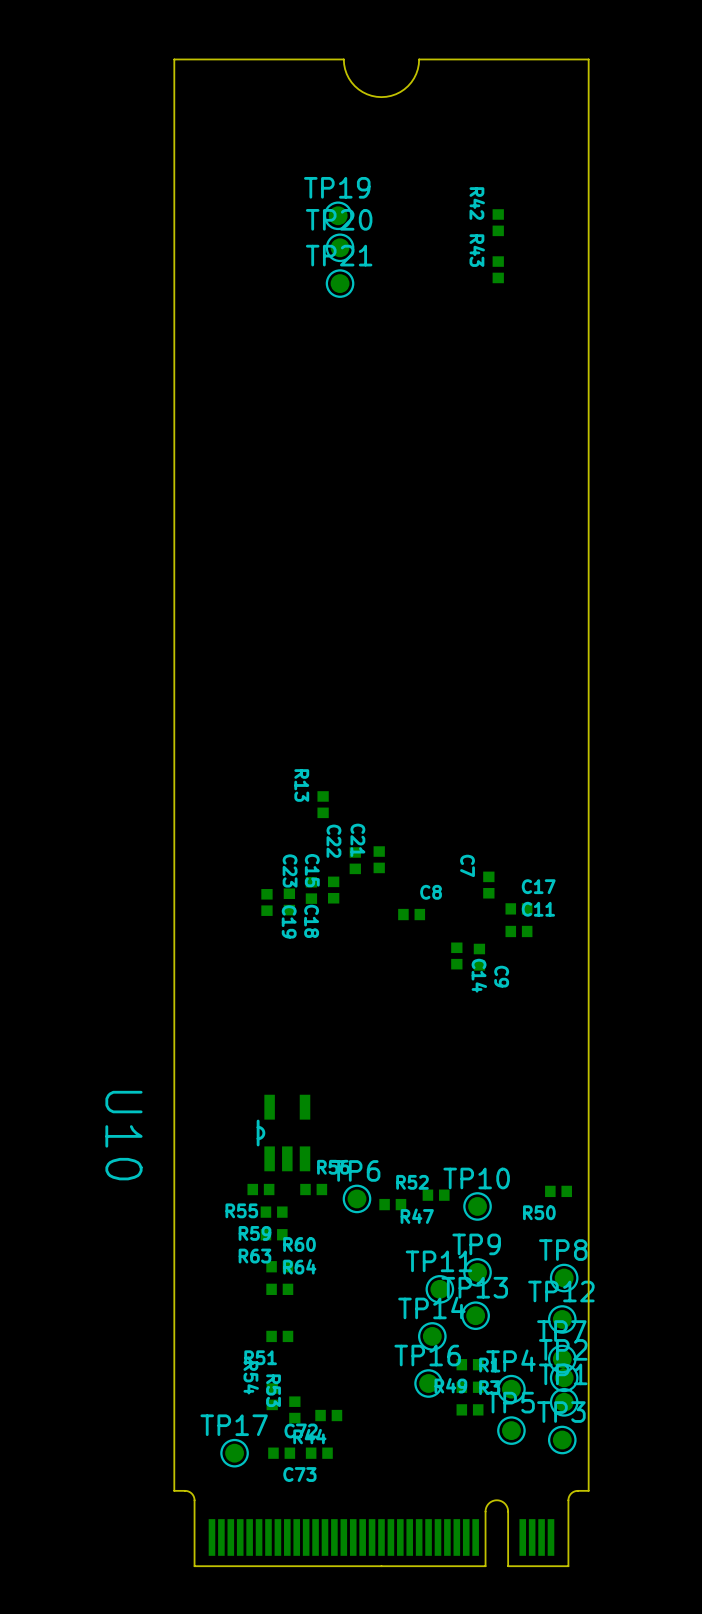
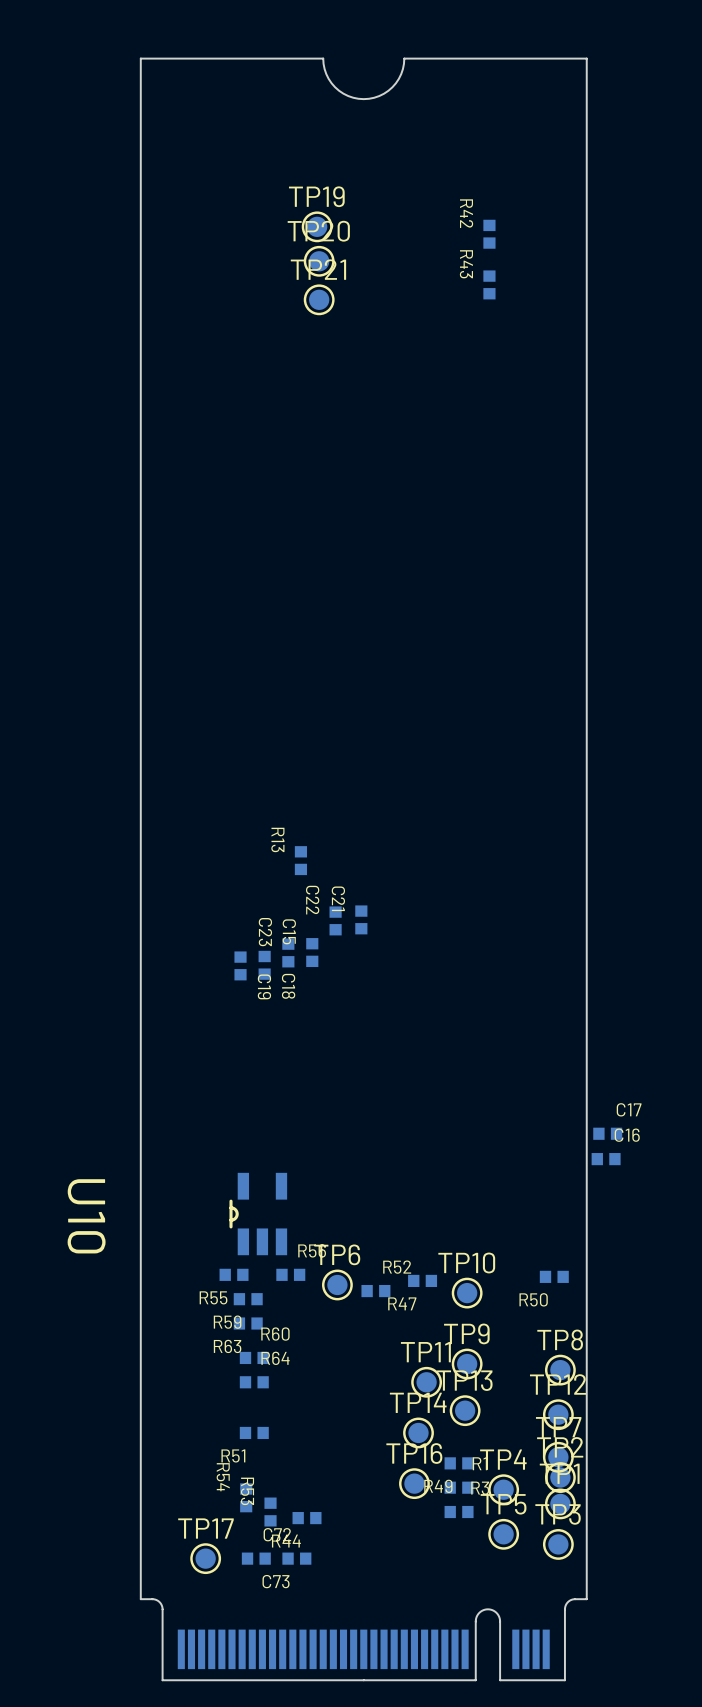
C7: (488, 885) -> none
C17 position: (518, 908) -> (607, 1133)
C8: (411, 914) -> none
C11: (518, 931) -> none
C14: (456, 955) -> none
C9: (479, 957) -> none
C16: none -> (606, 1159)

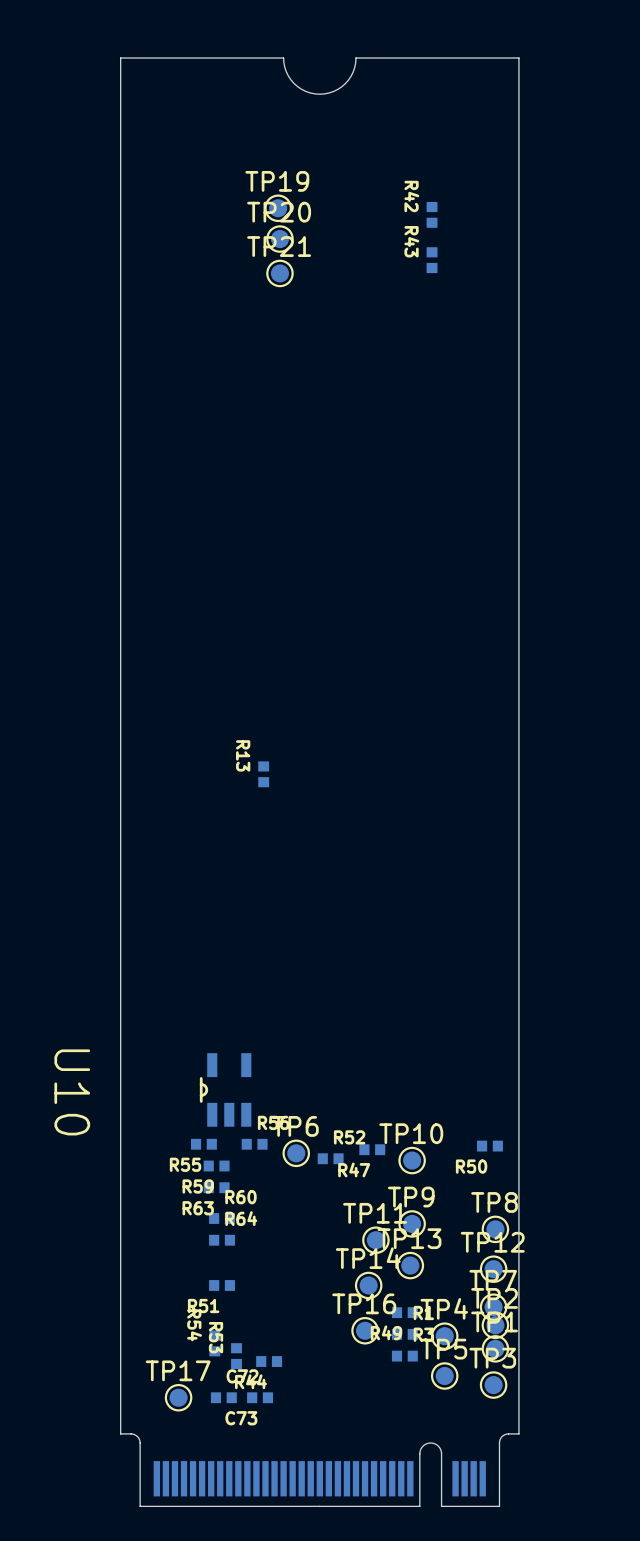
C21: (361, 919) -> none
C22: (335, 920) -> none
C23: (288, 952) -> none
C15: (312, 952) -> none
C19: (240, 965) -> none
C18: (264, 965) -> none
C17: (607, 1133) -> none
C16: (606, 1159) -> none

